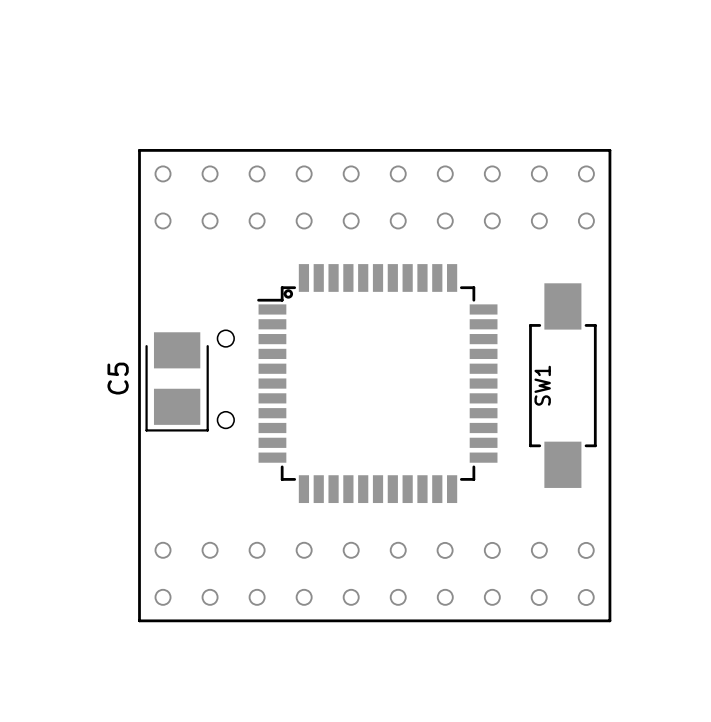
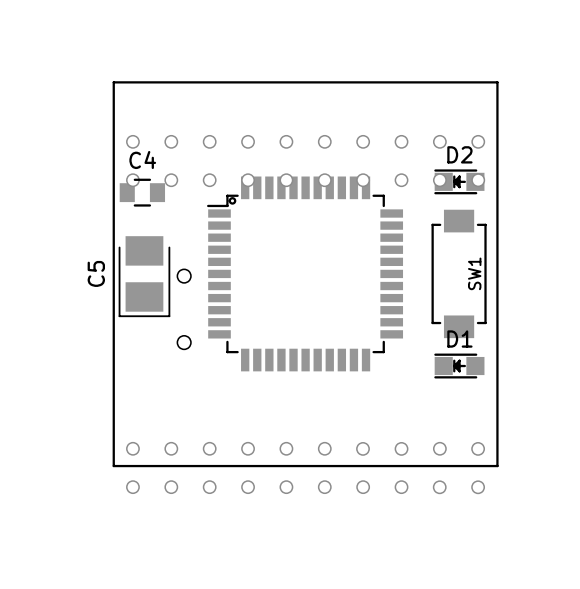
board edge: (139, 150) (609, 150) -> (113, 122) (113, 82) (497, 82) (497, 122)
D2: none -> (459, 181)
C4: none -> (142, 192)
SW1 footprint: [529, 283, 597, 488] -> [431, 209, 487, 339]
C5 position: (177, 381) -> (144, 276)
part position: (377, 383) -> (305, 273)
SW1 name position: SW1 (542, 385) -> SW1 (474, 273)
D1: none -> (459, 366)
board edge: (139, 571) (139, 620) (609, 620) (609, 571) -> (113, 466) (497, 466)

